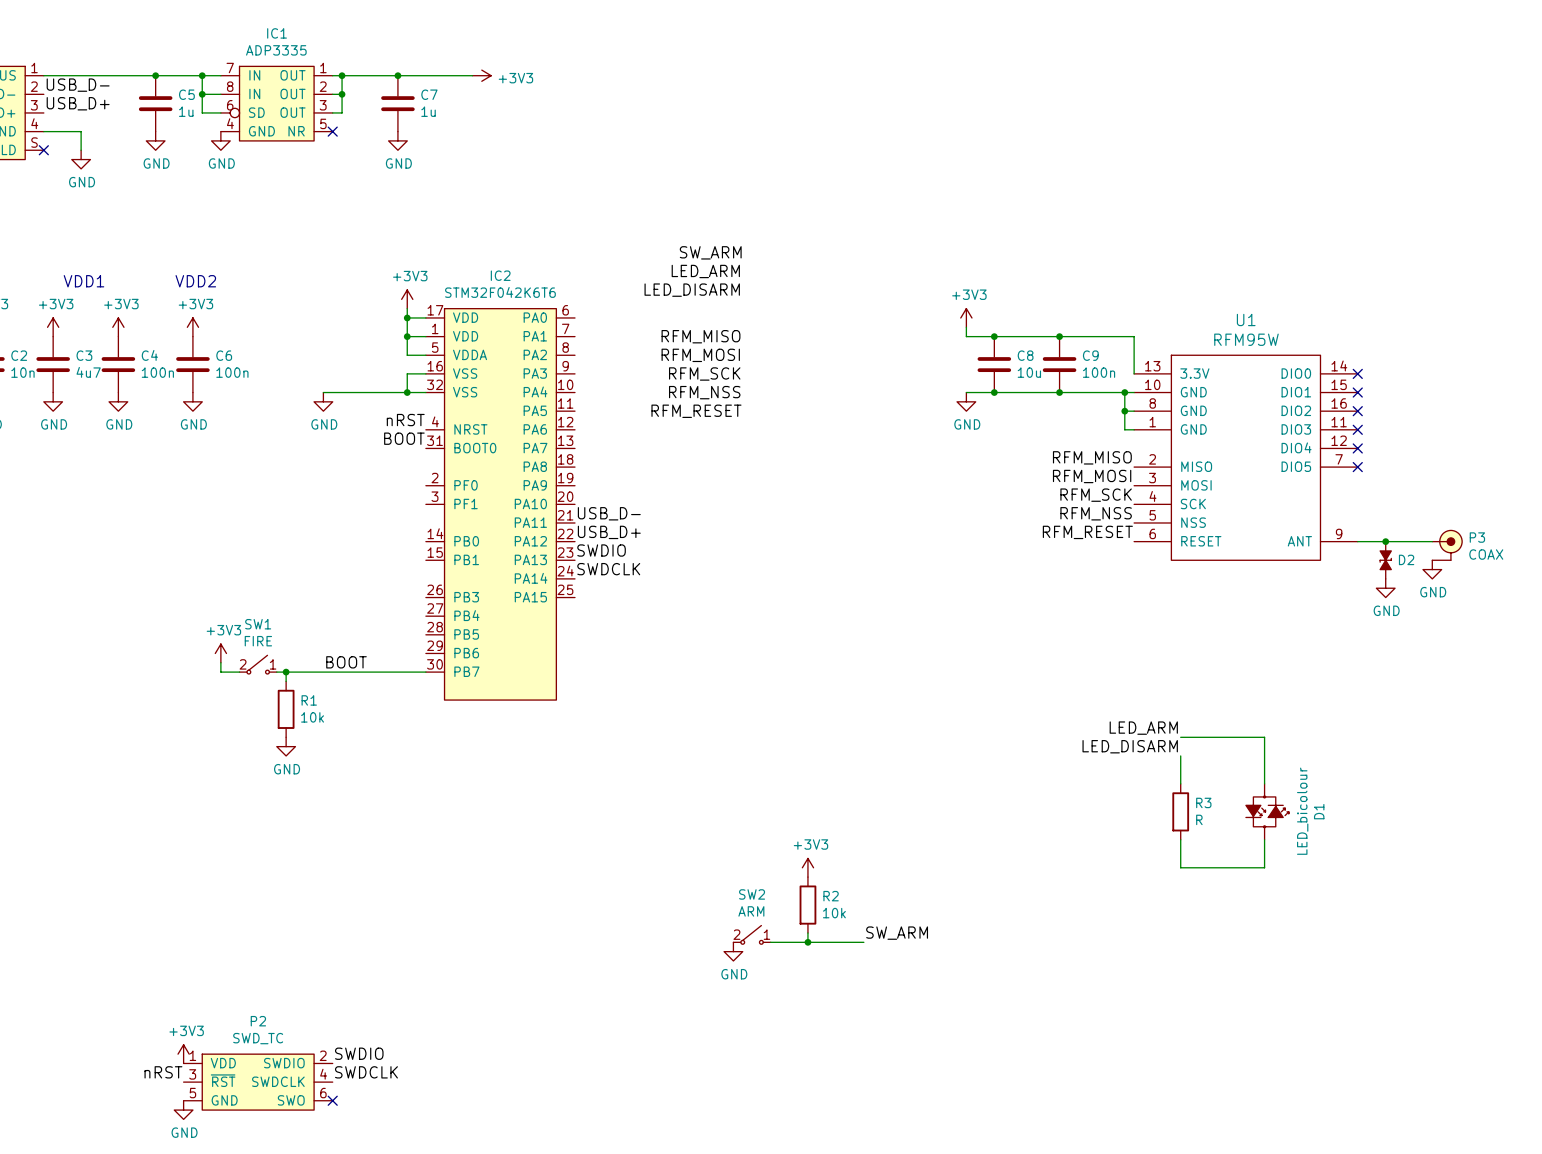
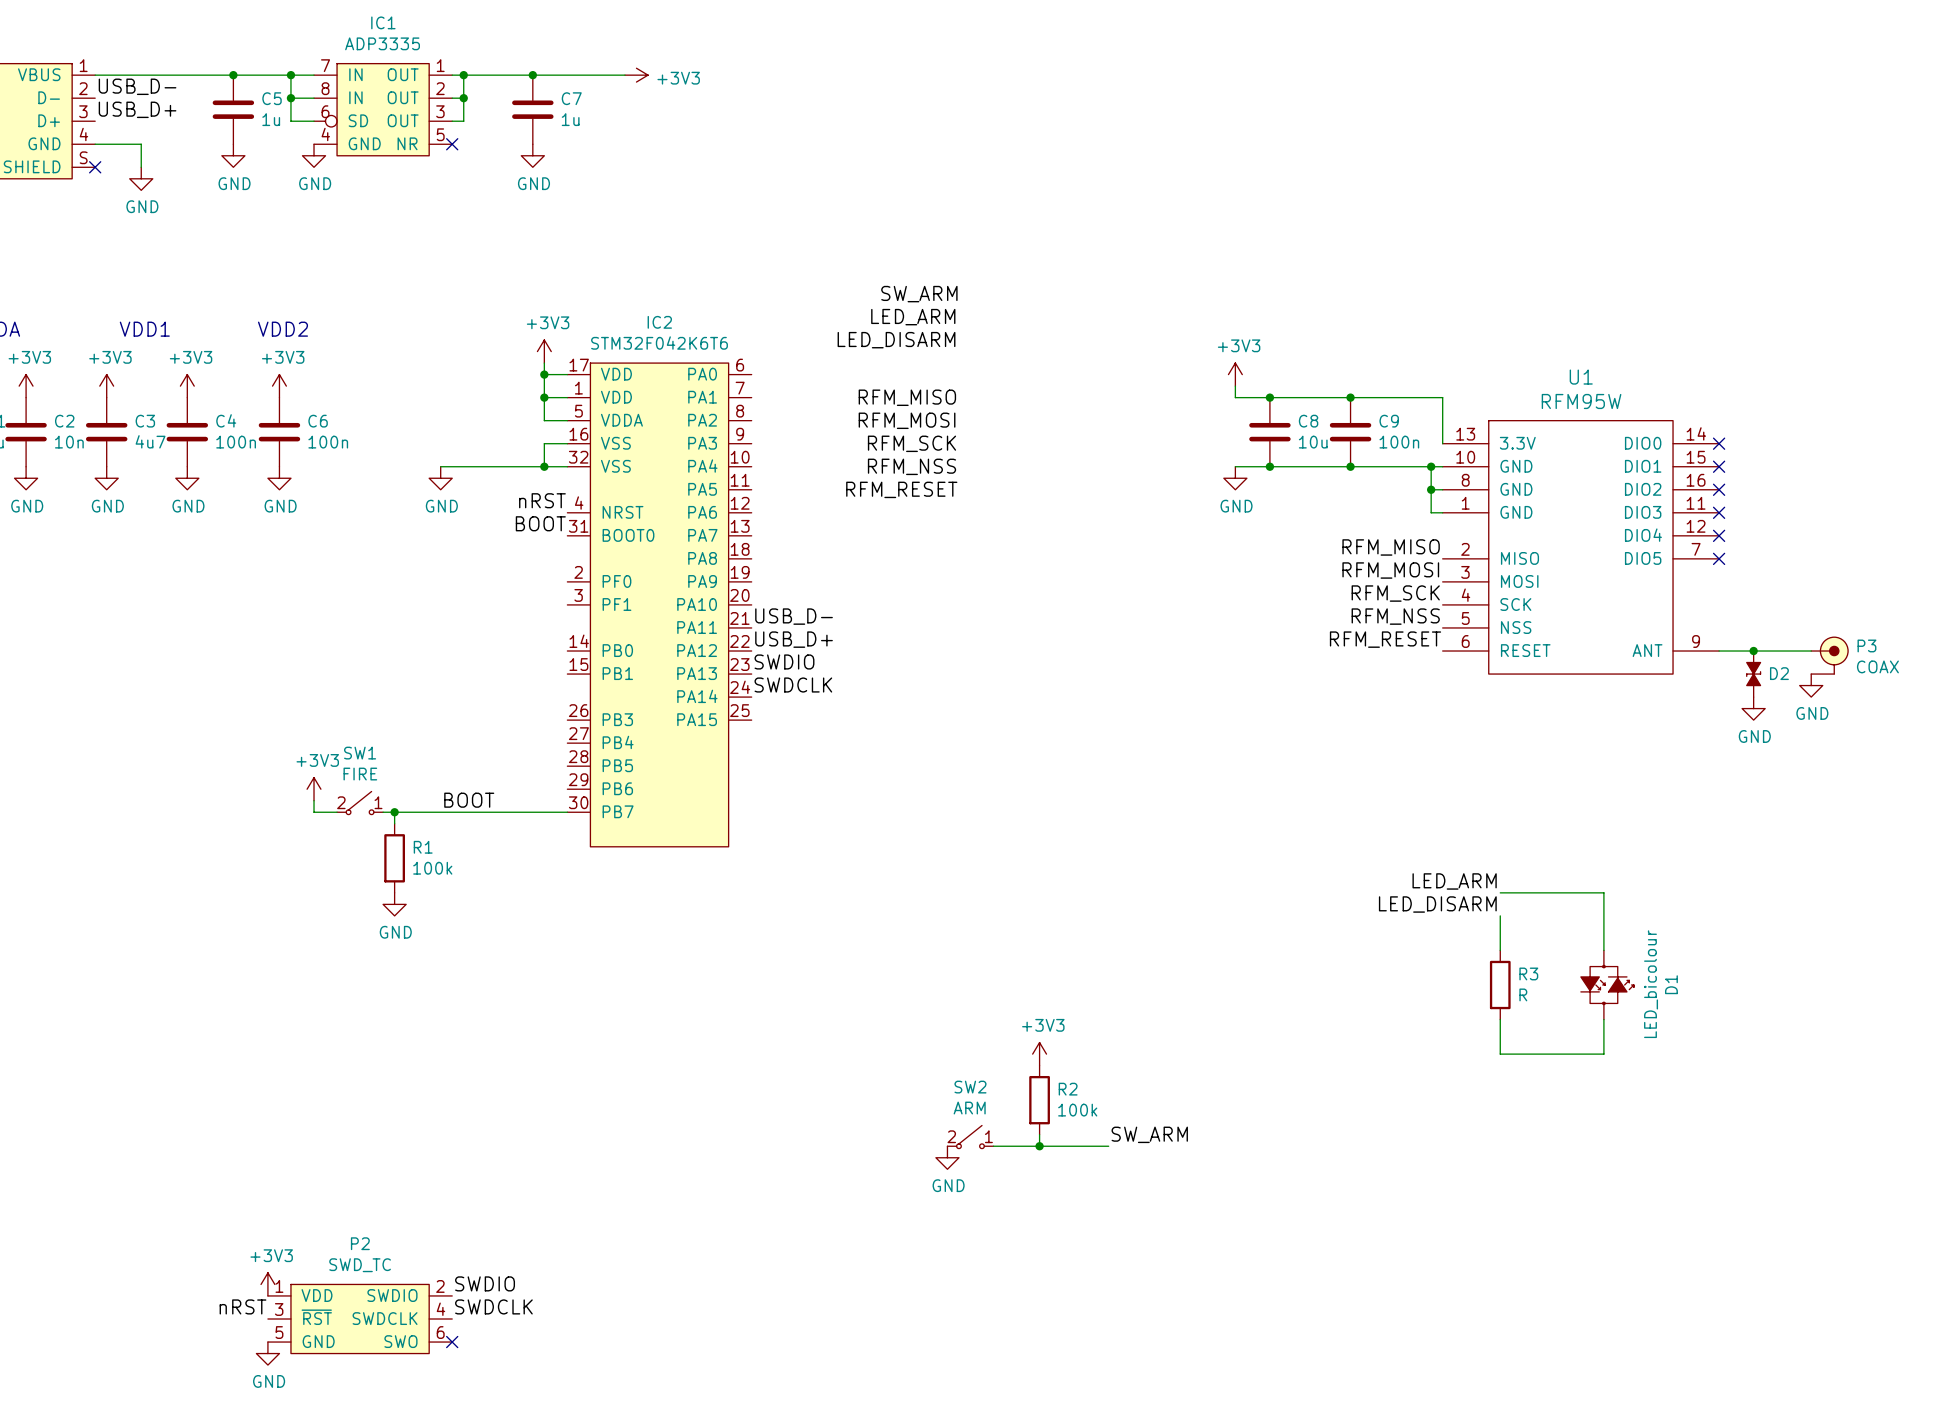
R1 value: 10k (312, 717) -> 100k (432, 868)
R2 value: 10k (834, 913) -> 100k (1077, 1110)

